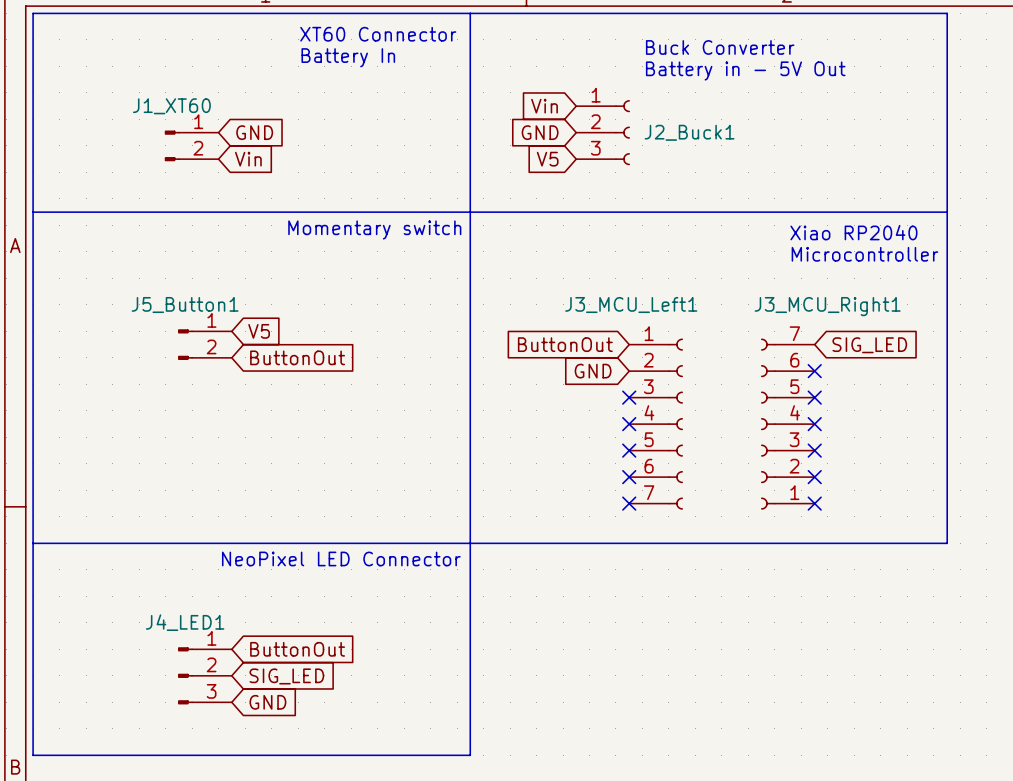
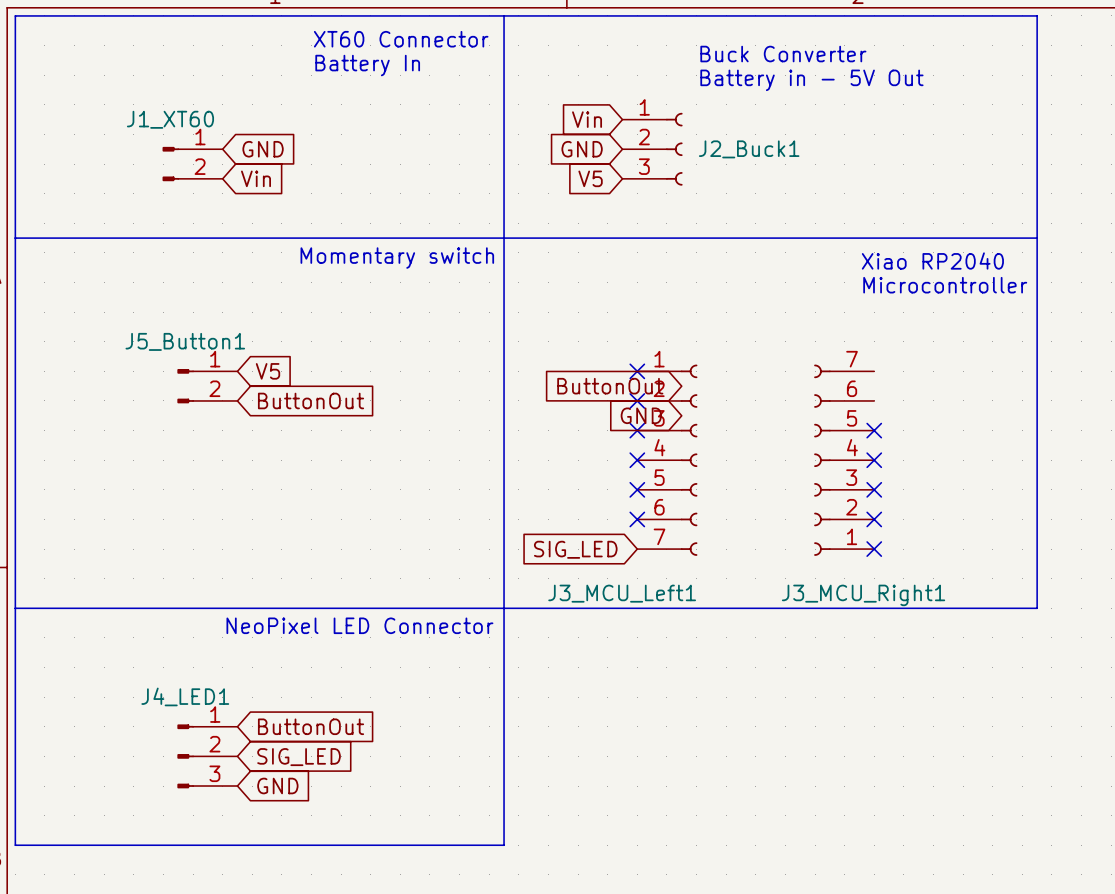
J3_MCU_Left1 name position: J3_MCU_Left1 (631, 305) -> J3_MCU_Left1 (622, 593)
J3_MCU_Right1 name position: J3_MCU_Right1 (827, 306) -> J3_MCU_Right1 (863, 595)
no-connect mark: none -> (637, 371)
global label: SIG_LED (869, 345) -> none
no-connect mark: none -> (637, 400)
no-connect mark: (814, 371) -> none
no-connect mark: none -> (637, 430)
no-connect mark: none -> (874, 430)
no-connect mark: (629, 397) -> none
no-connect mark: (814, 397) -> none
no-connect mark: none -> (637, 460)
no-connect mark: none -> (874, 460)
no-connect mark: (629, 424) -> none
J3_MCU_Left1 position: (656, 424) -> (667, 460)
J3_MCU_Right1 position: (787, 424) -> (844, 460)
no-connect mark: (814, 424) -> none
no-connect mark: none -> (637, 489)
no-connect mark: none -> (874, 489)
no-connect mark: (629, 450) -> none
no-connect mark: (814, 450) -> none
no-connect mark: none -> (637, 519)
no-connect mark: none -> (874, 519)
no-connect mark: (629, 477) -> none
no-connect mark: (814, 477) -> none
global label: none -> SIG_LED (575, 549)
no-connect mark: none -> (874, 549)
no-connect mark: (629, 503) -> none
no-connect mark: (814, 503) -> none

